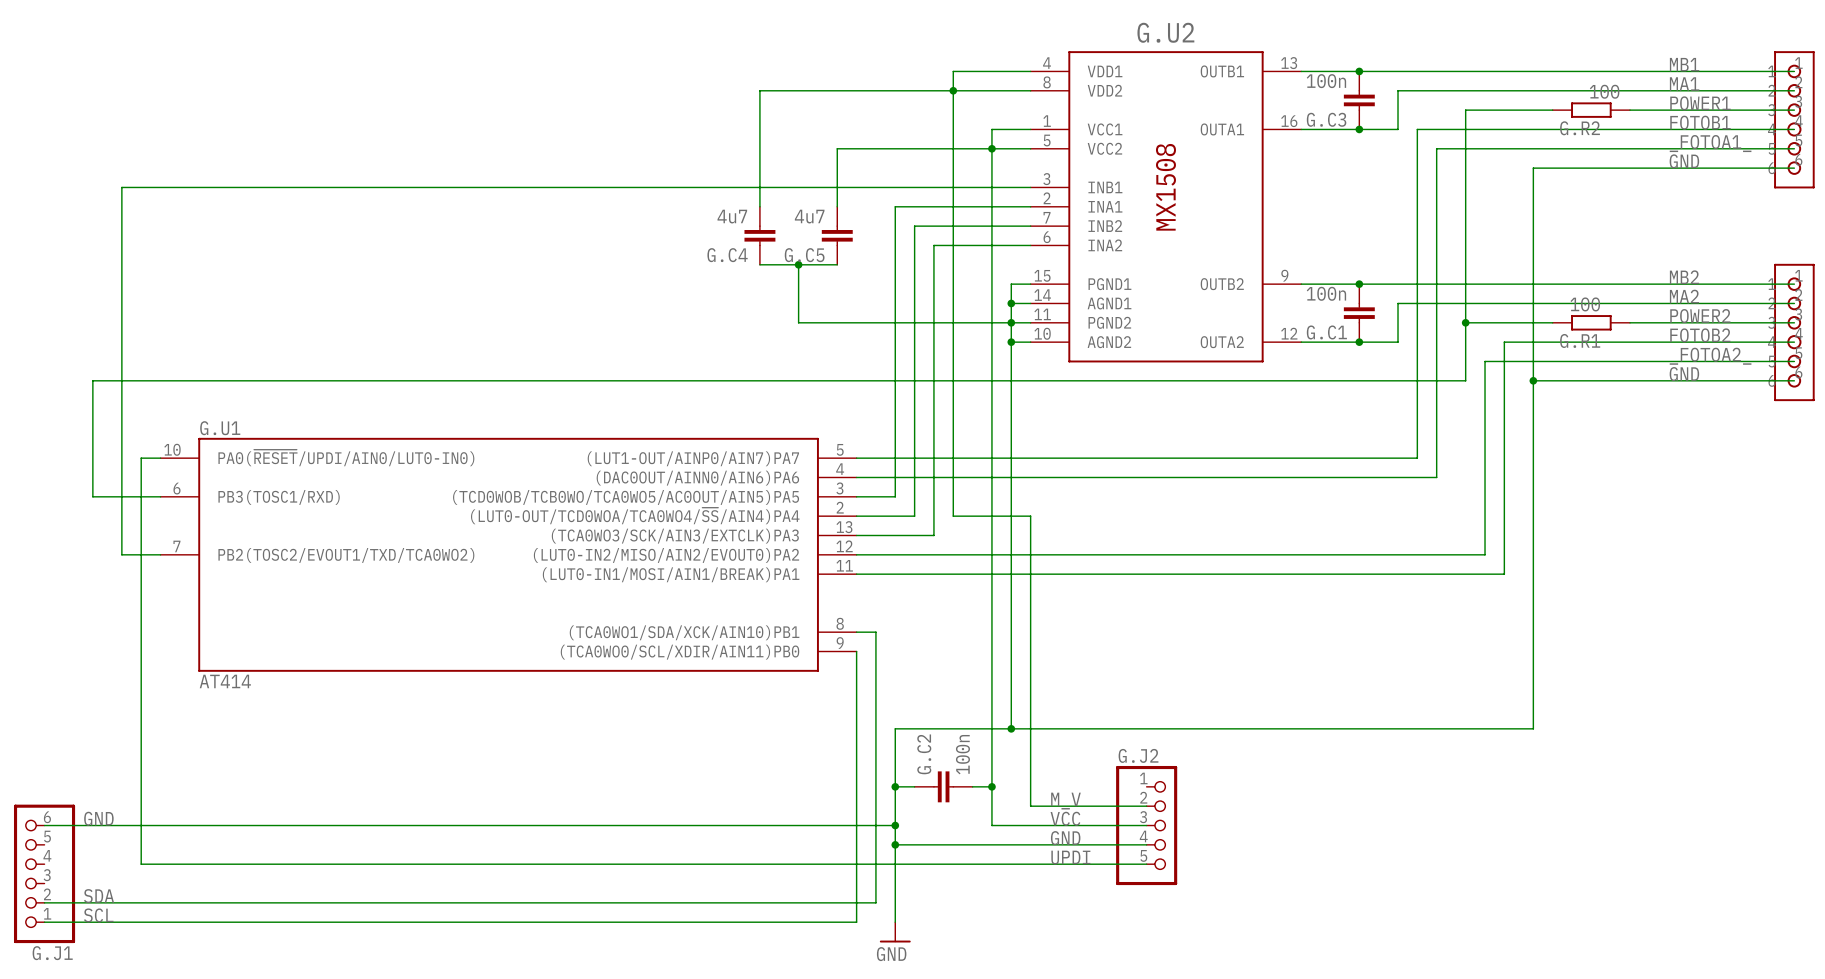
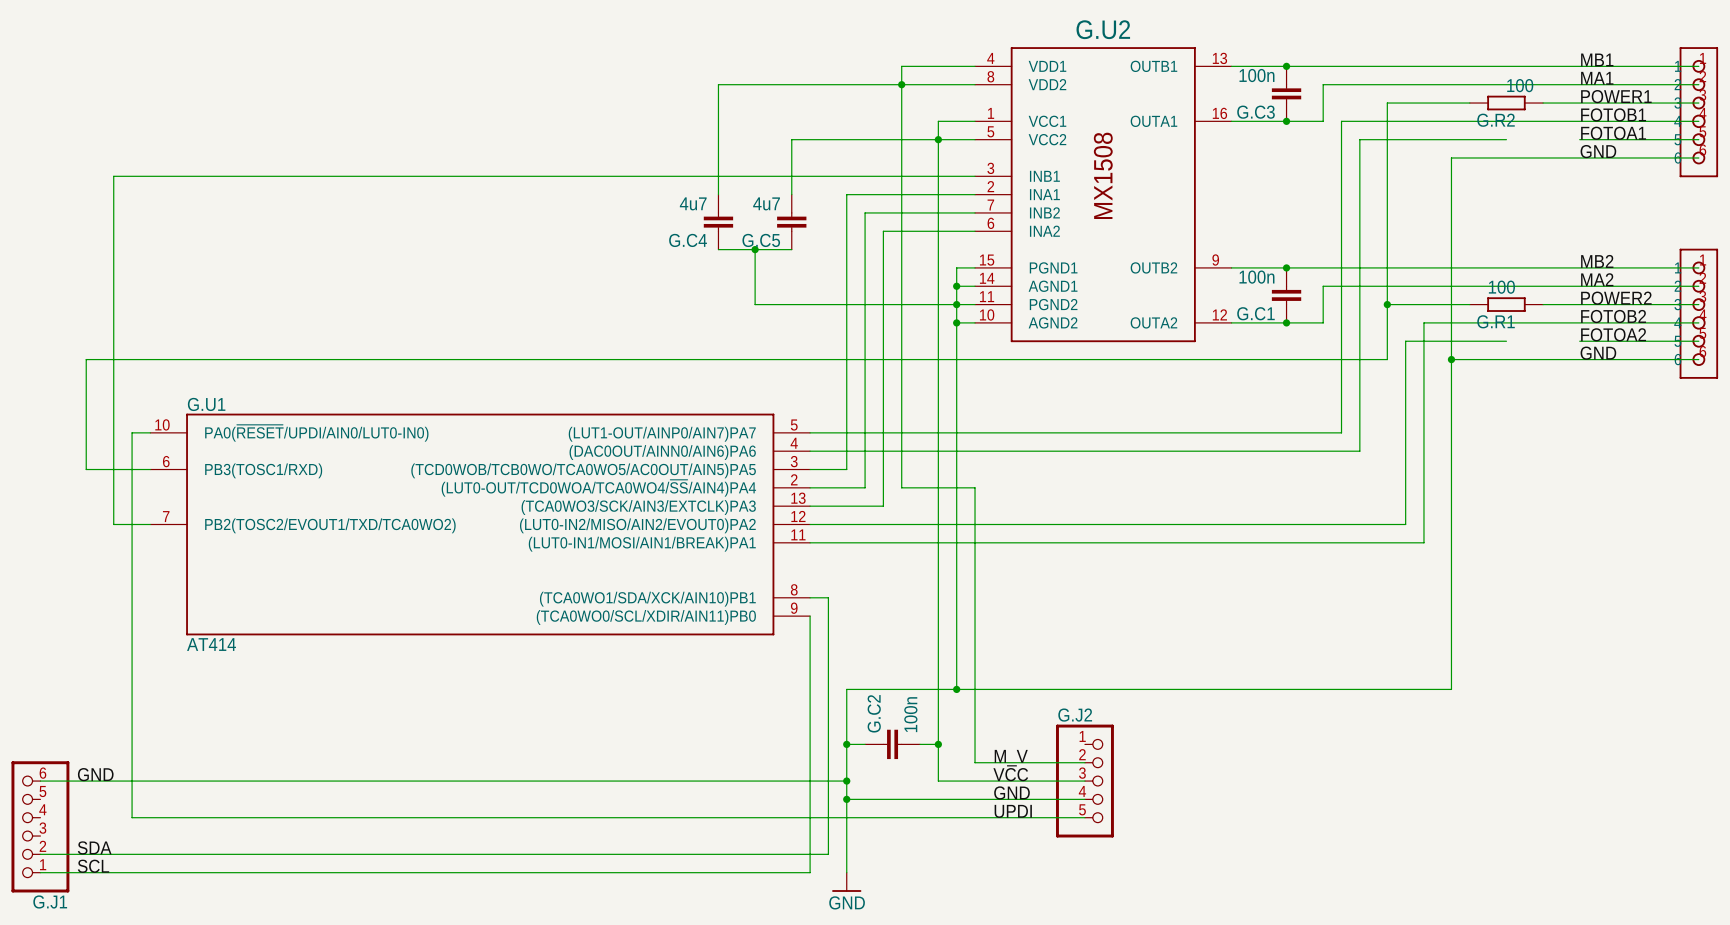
label: _FOTOA1_ (1710, 143) -> FOTOA1 (1613, 133)
wire: (1591, 148) (1668, 148) -> none
label: _FOTOA2_ (1710, 356) -> FOTOA2 (1613, 334)
wire: (1591, 361) (1668, 361) -> none

